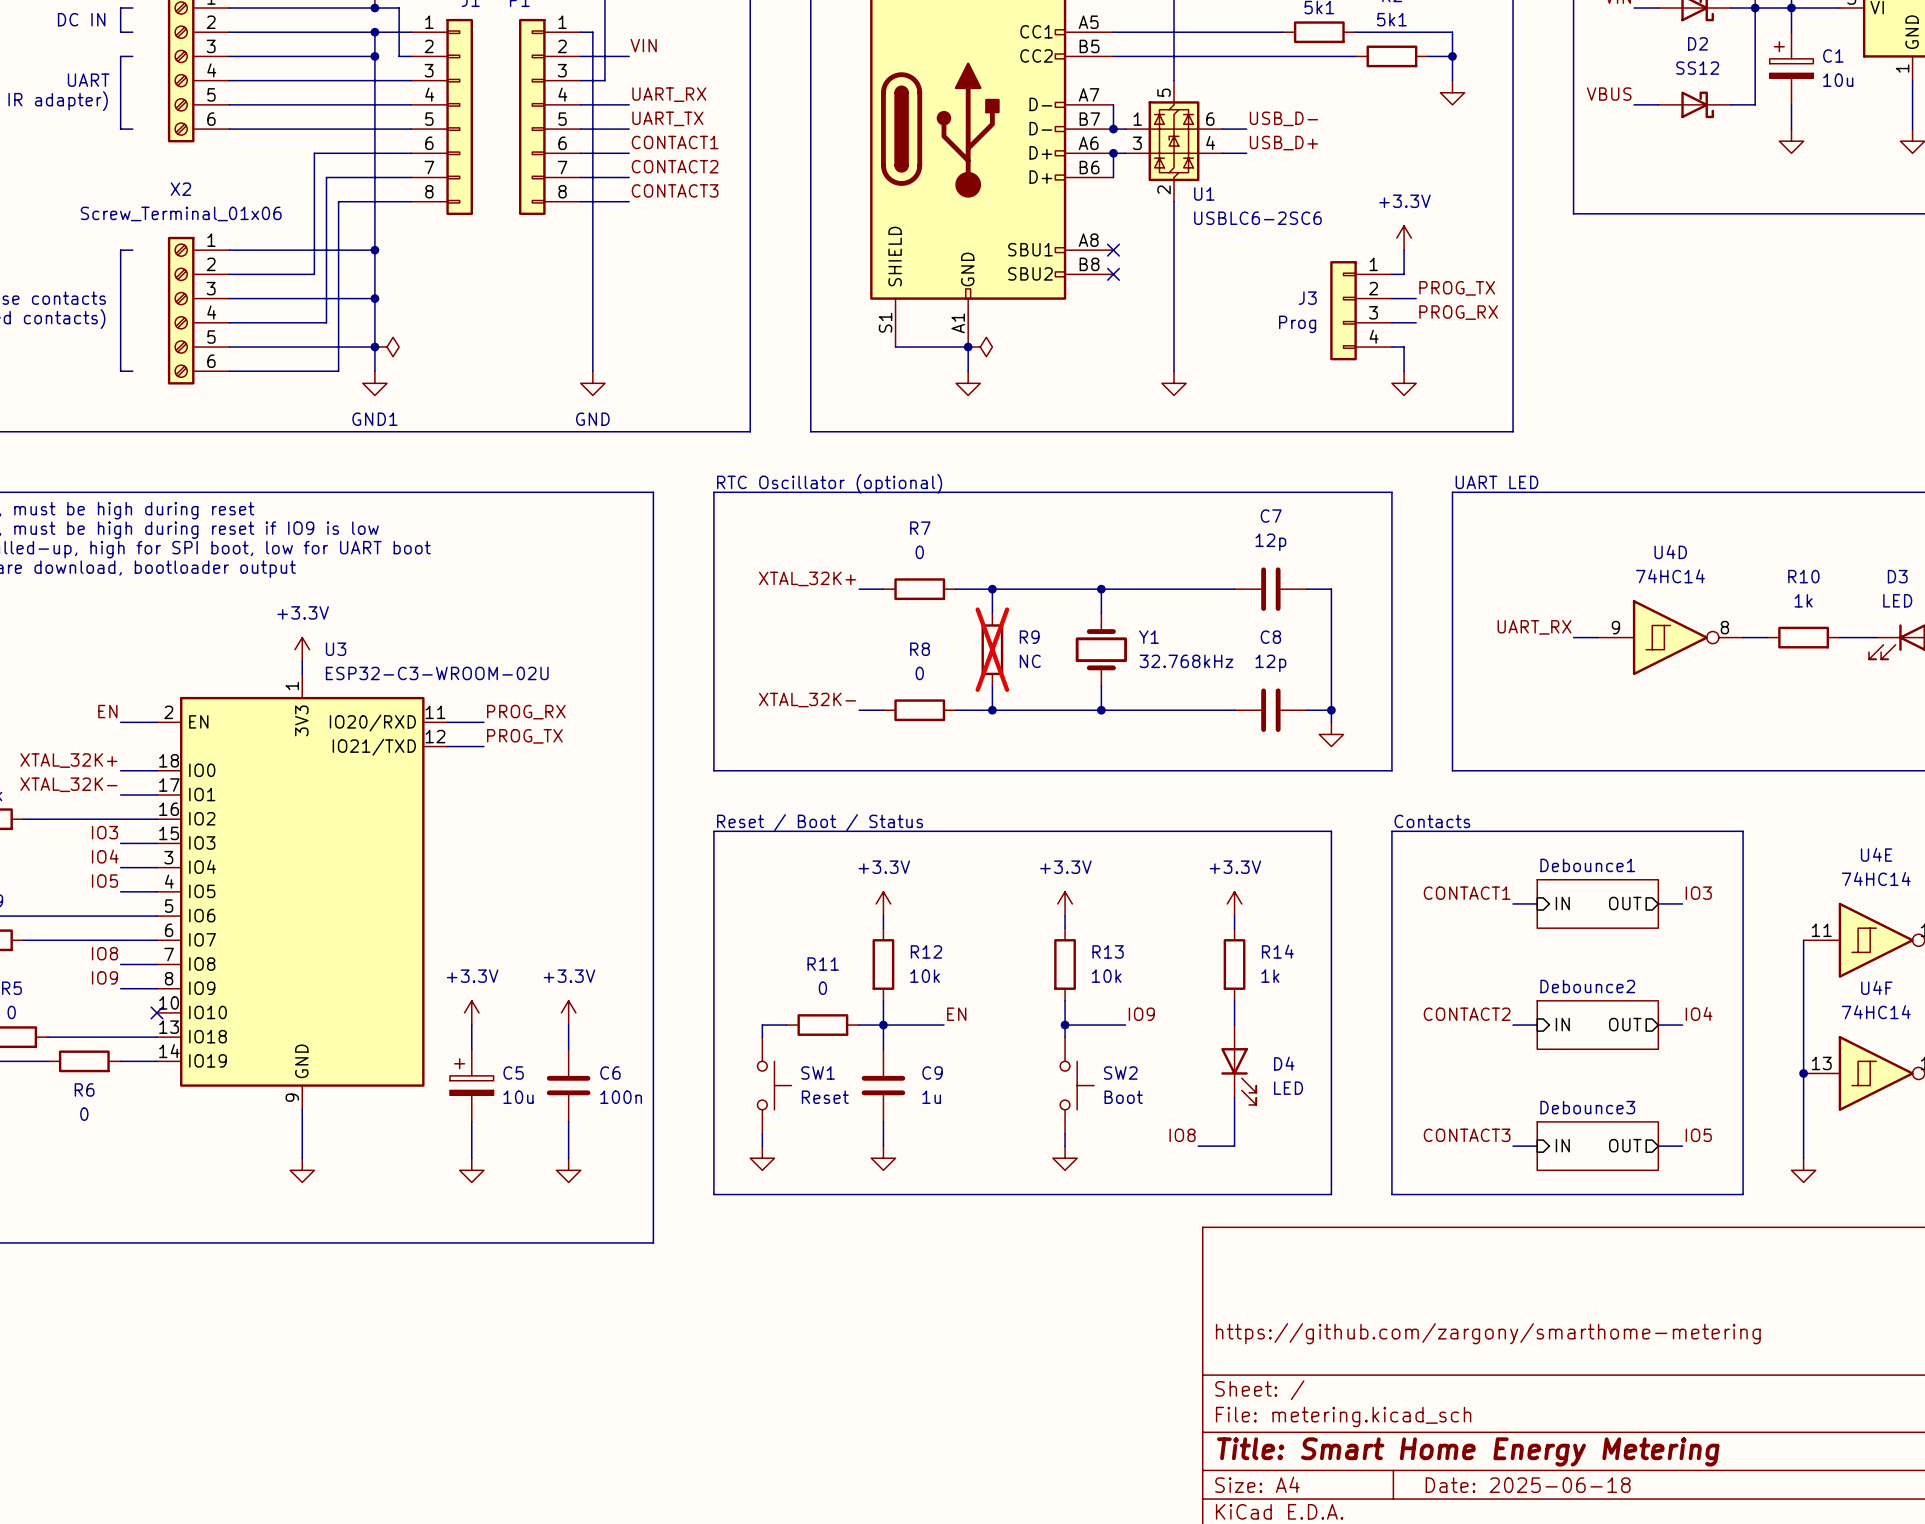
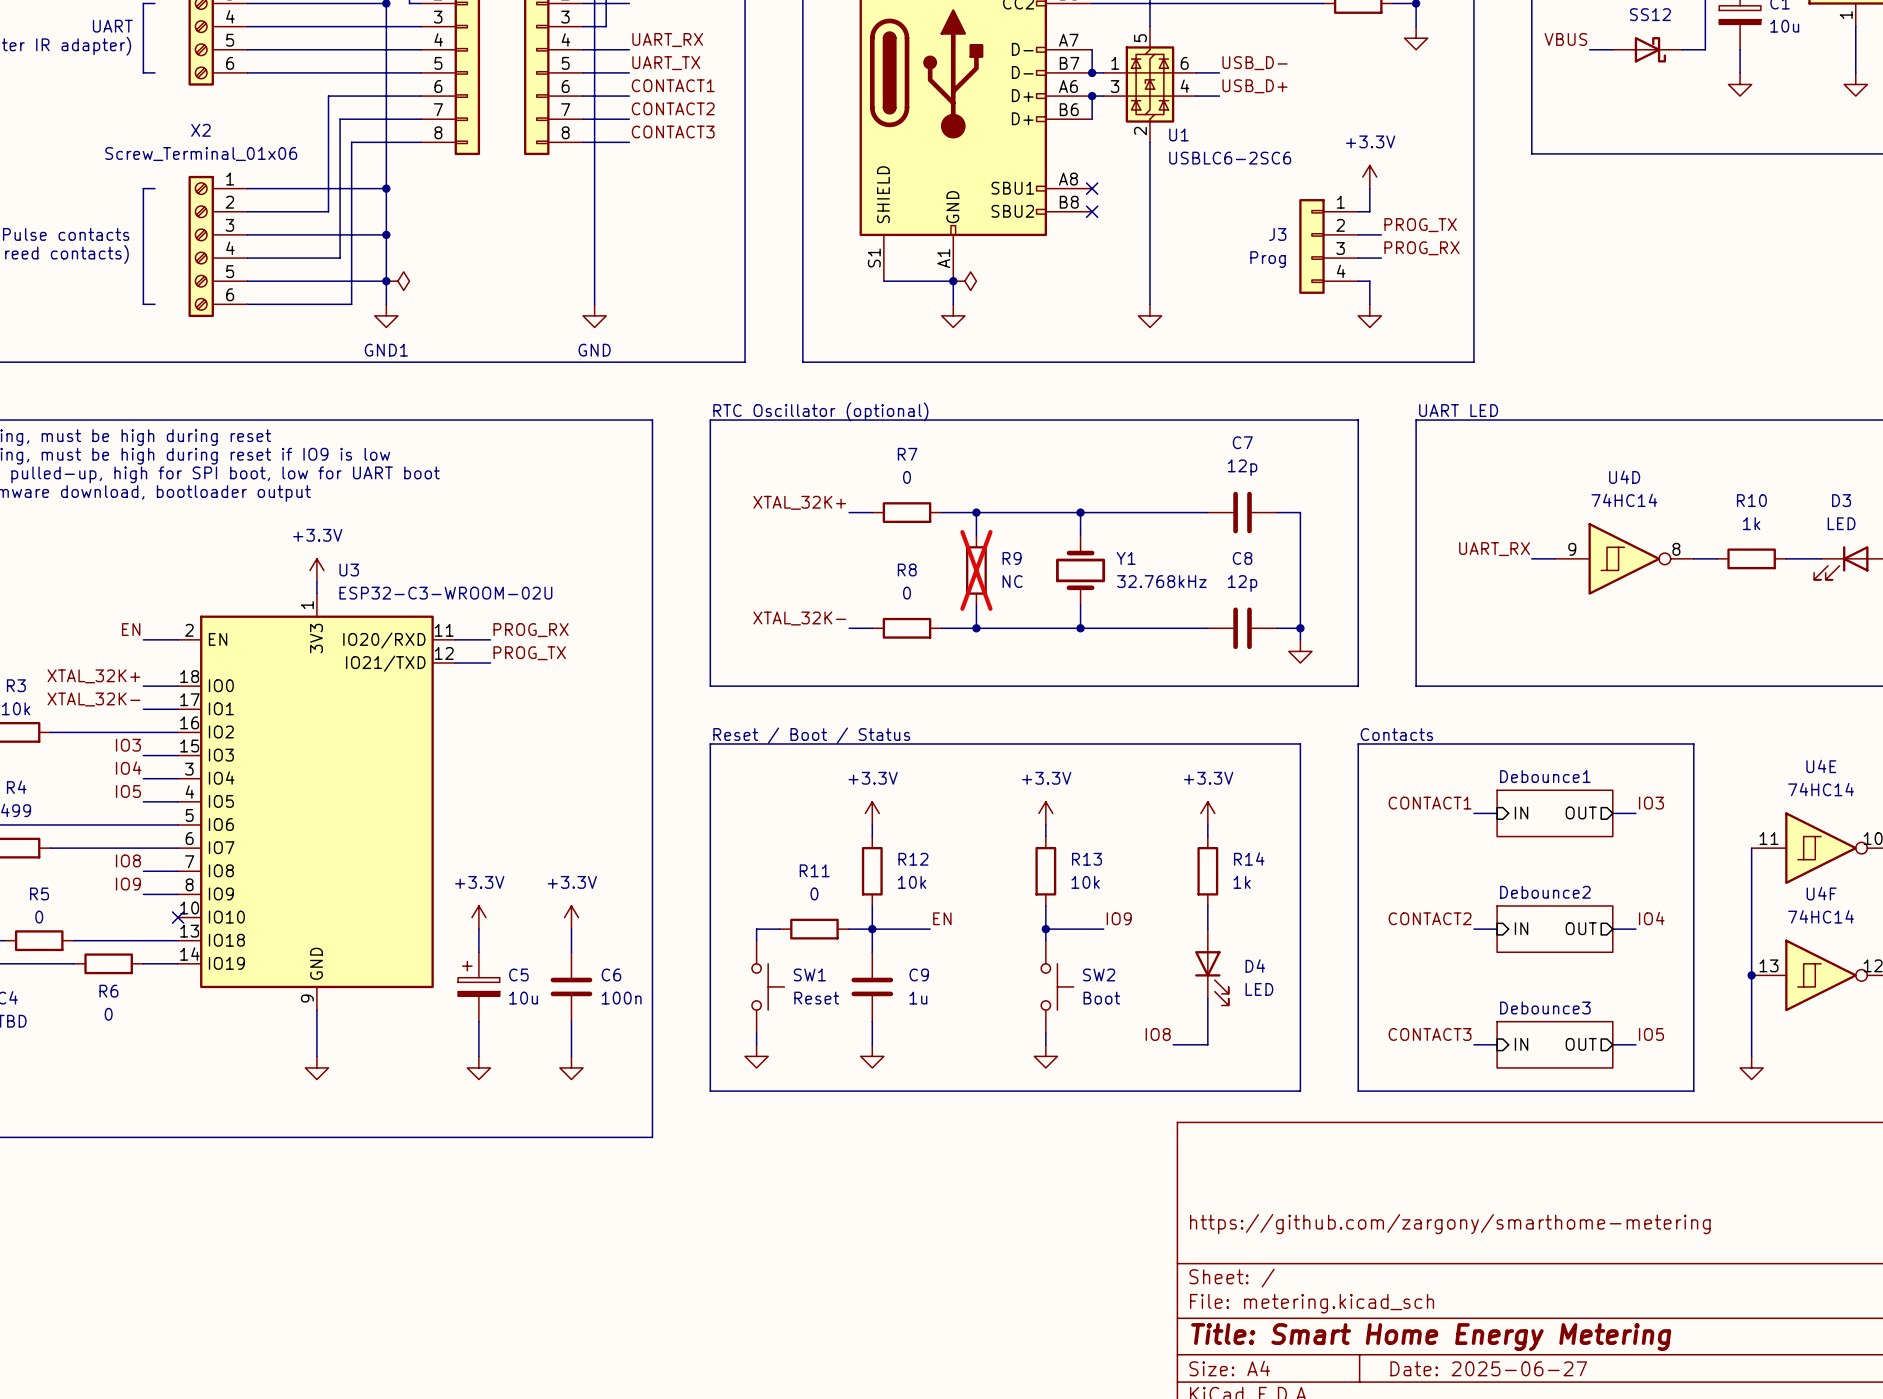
title block: Date: 2025-06-18 (1528, 1485) -> Date: 2025-06-27 (1488, 1368)

